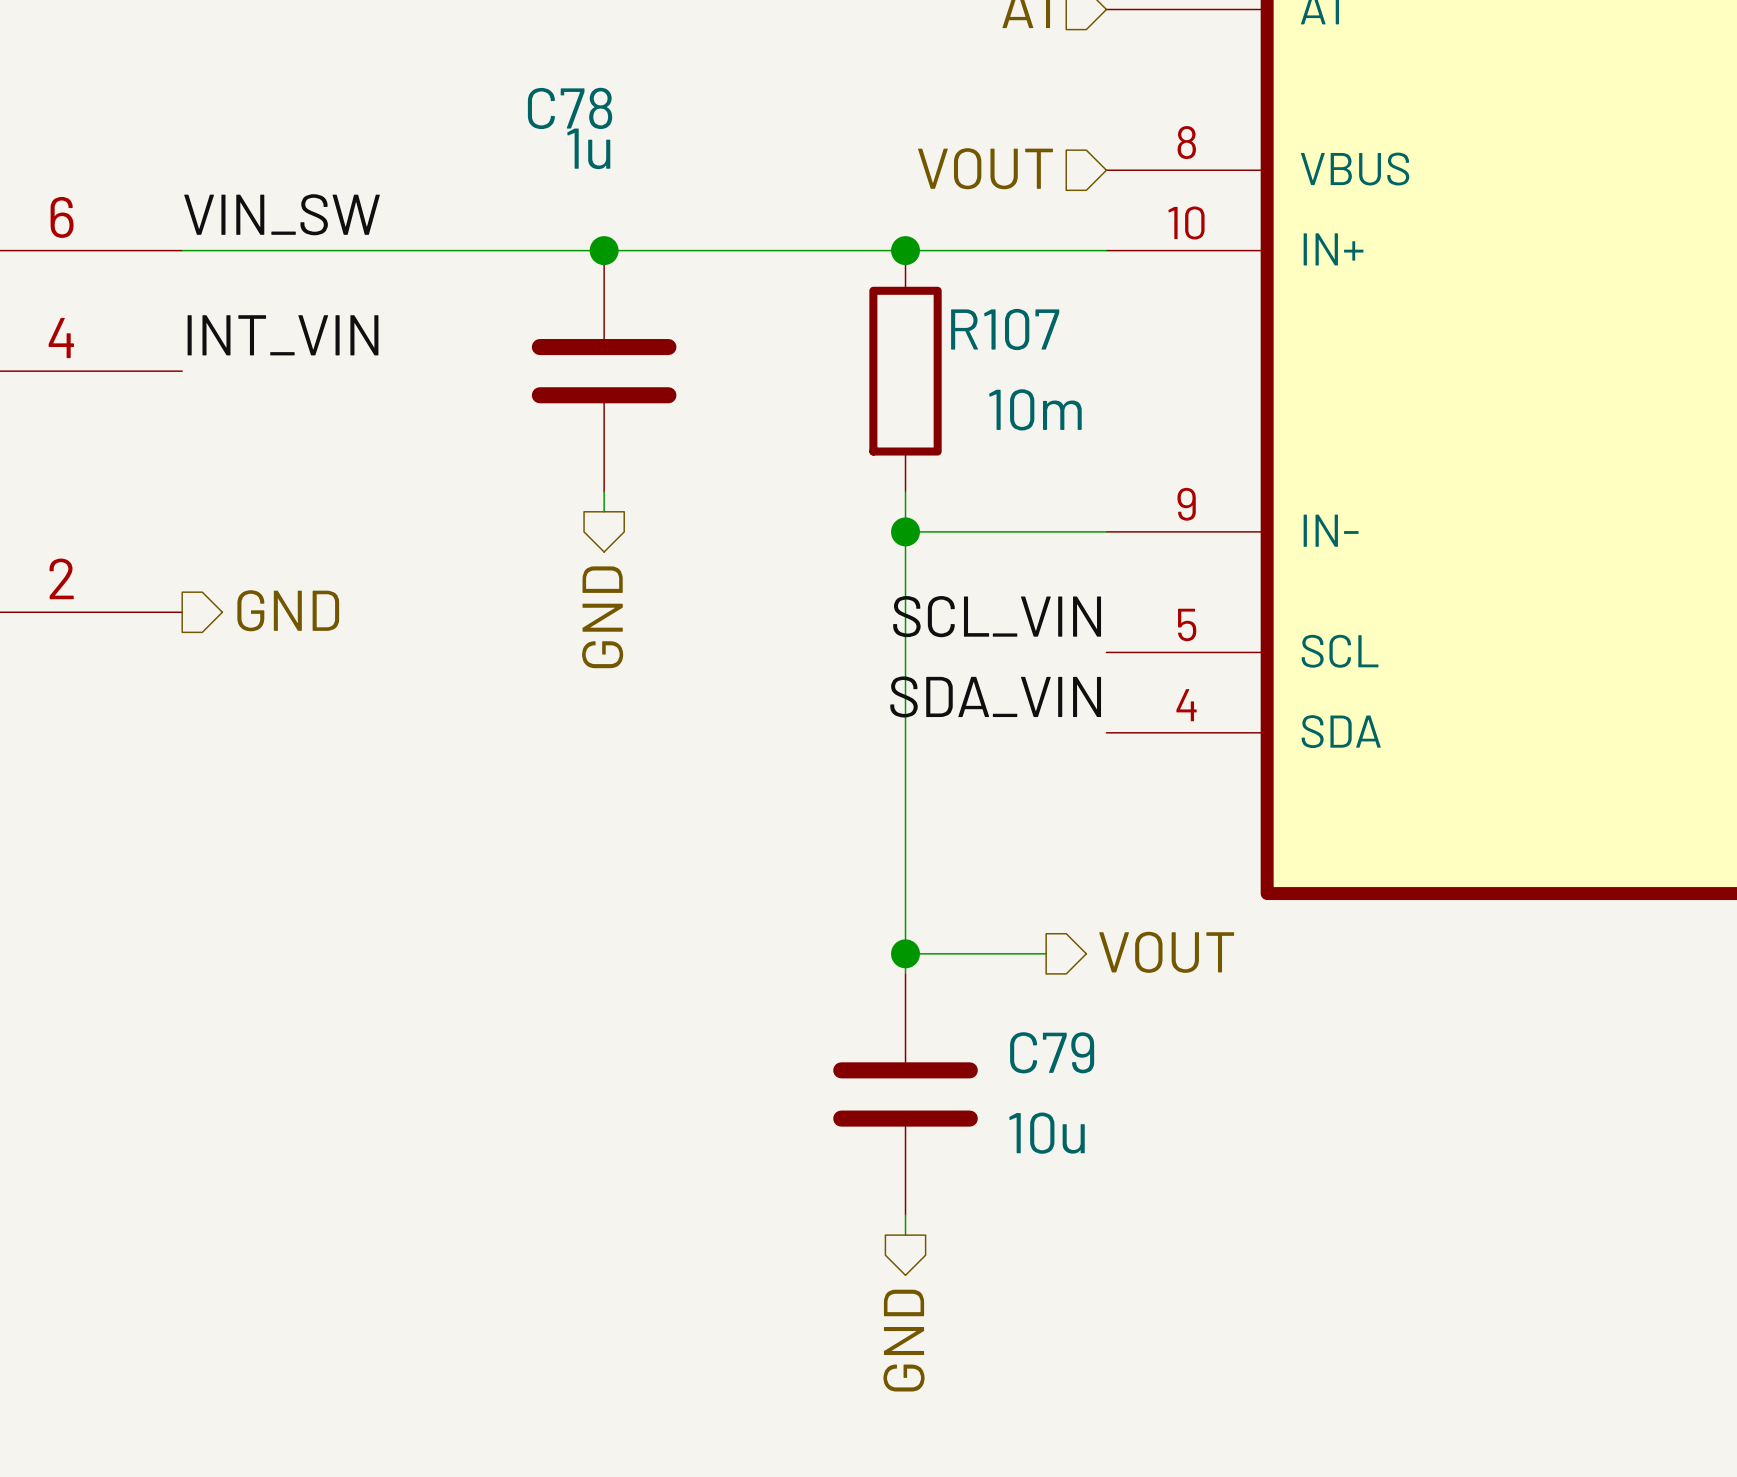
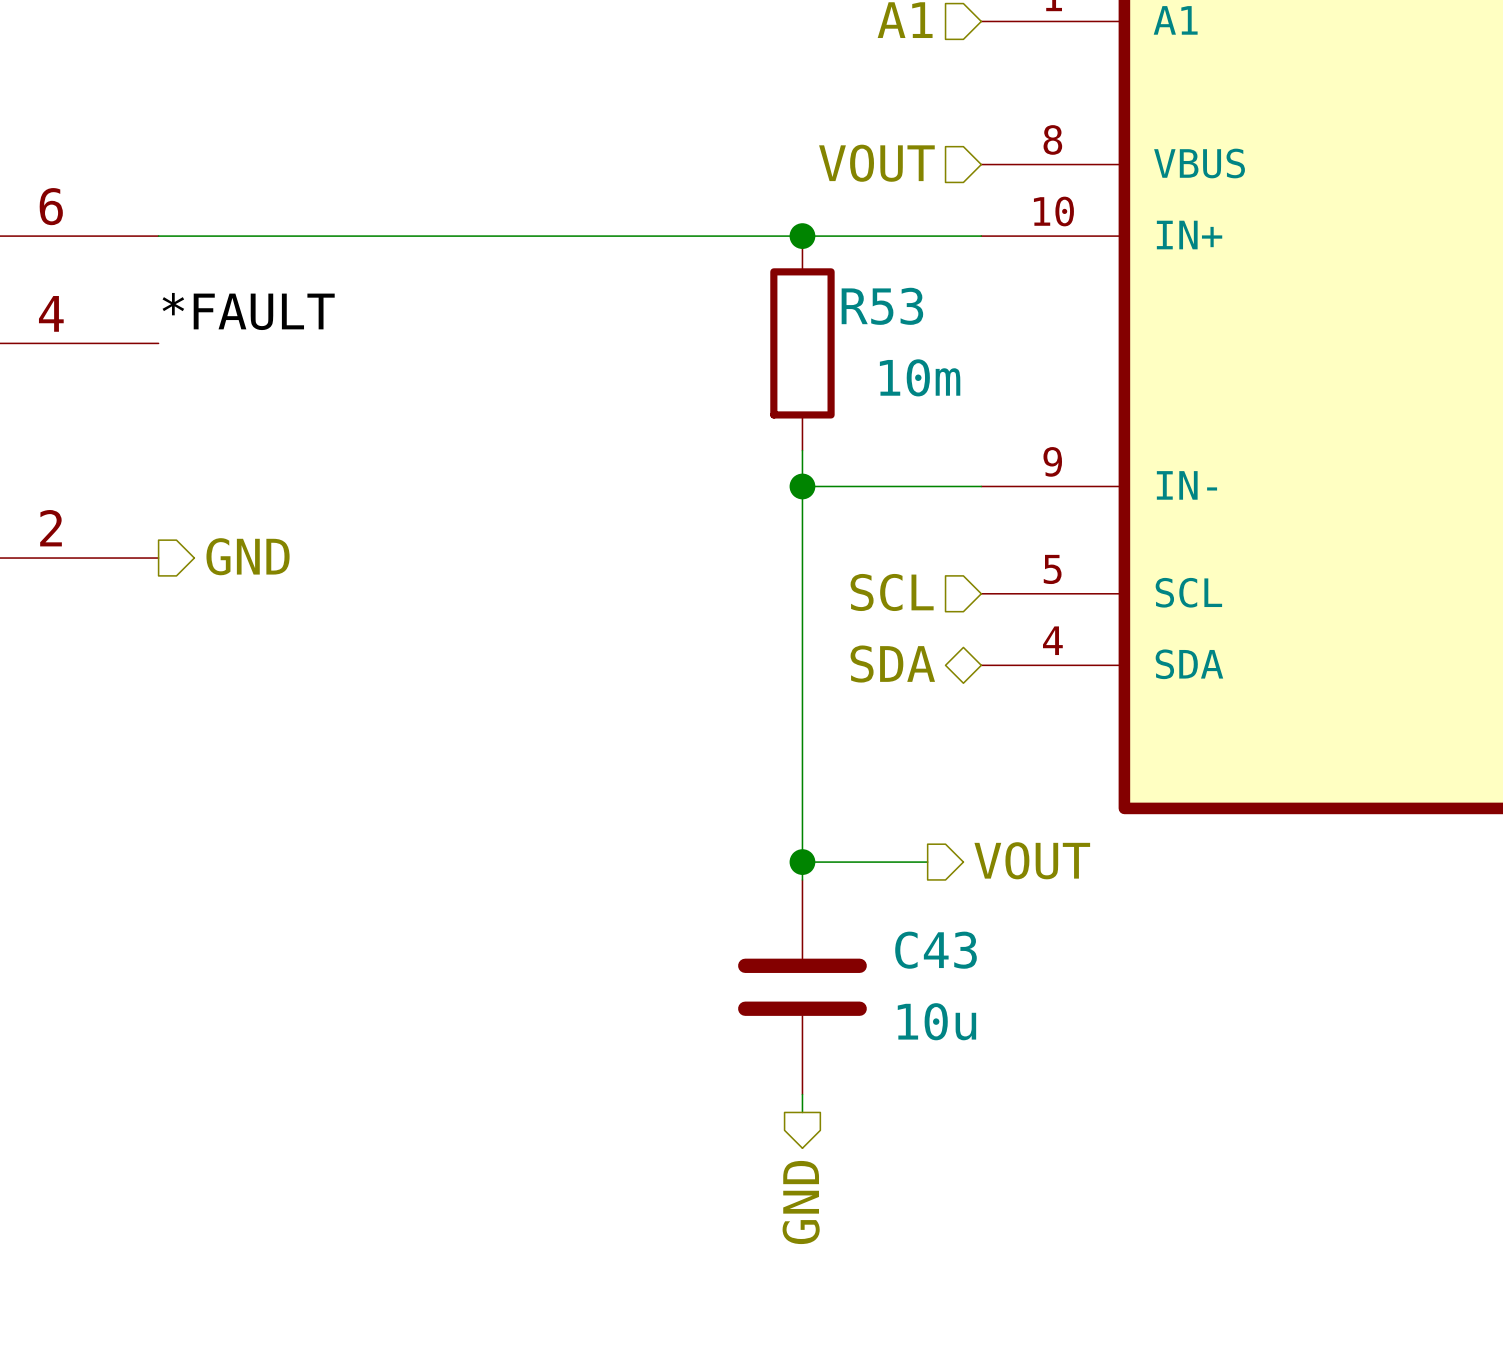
label: VIN_SW (282, 214) -> none
junction: (604, 250) -> none
R107 name: R107 (1005, 329) -> R53 (882, 306)
label: INT_VIN (283, 335) -> *FAULT (248, 311)
C78: 1u (604, 371) -> none
wire: (604, 491) (604, 511) -> none
label: SCL_VIN (997, 616) -> none
hierarchical label: GND (602, 617) -> none
hierarchical label: none -> SCL (892, 592)
label: SDA_VIN (995, 696) -> none
hierarchical label: none -> SDA (892, 664)
C79 name: C79 (1052, 1052) -> C43 (936, 950)

